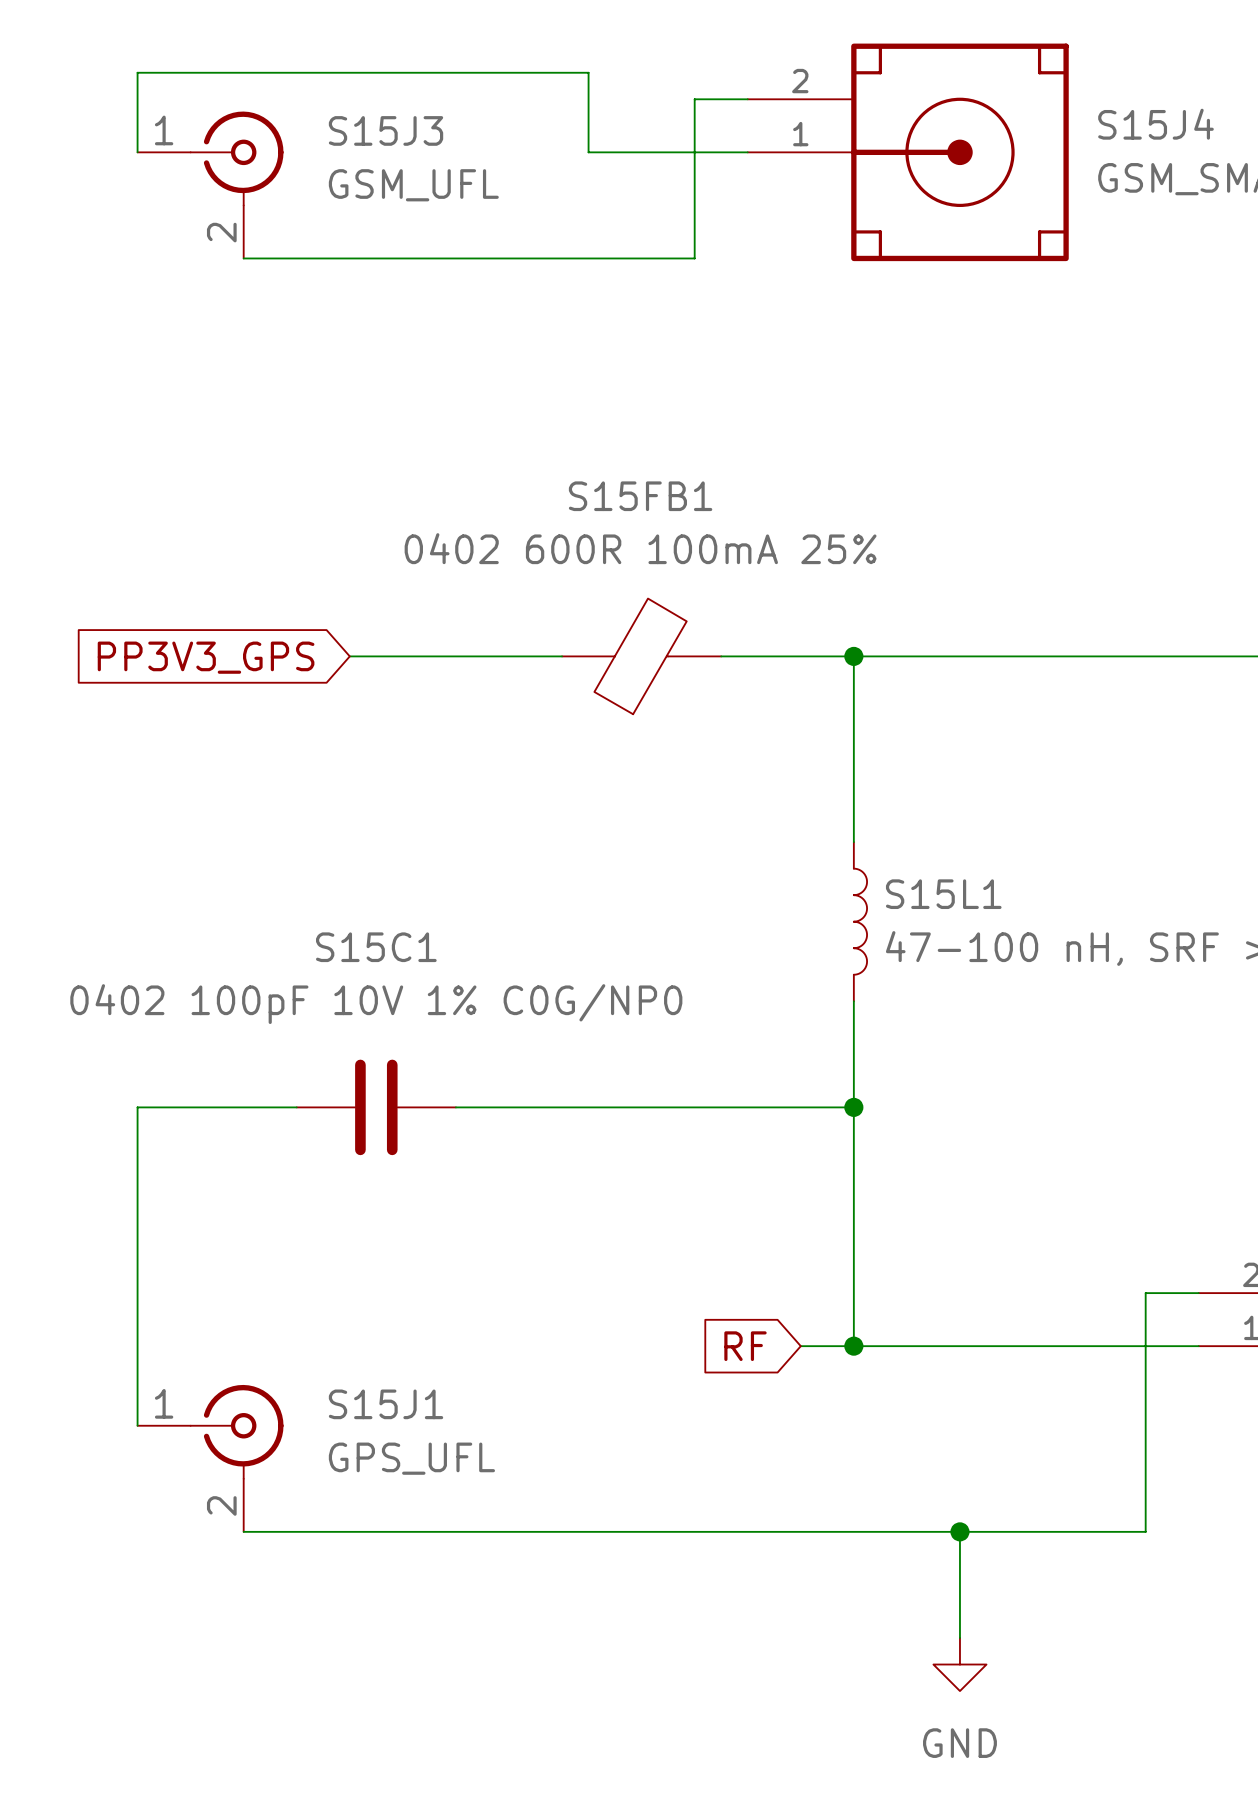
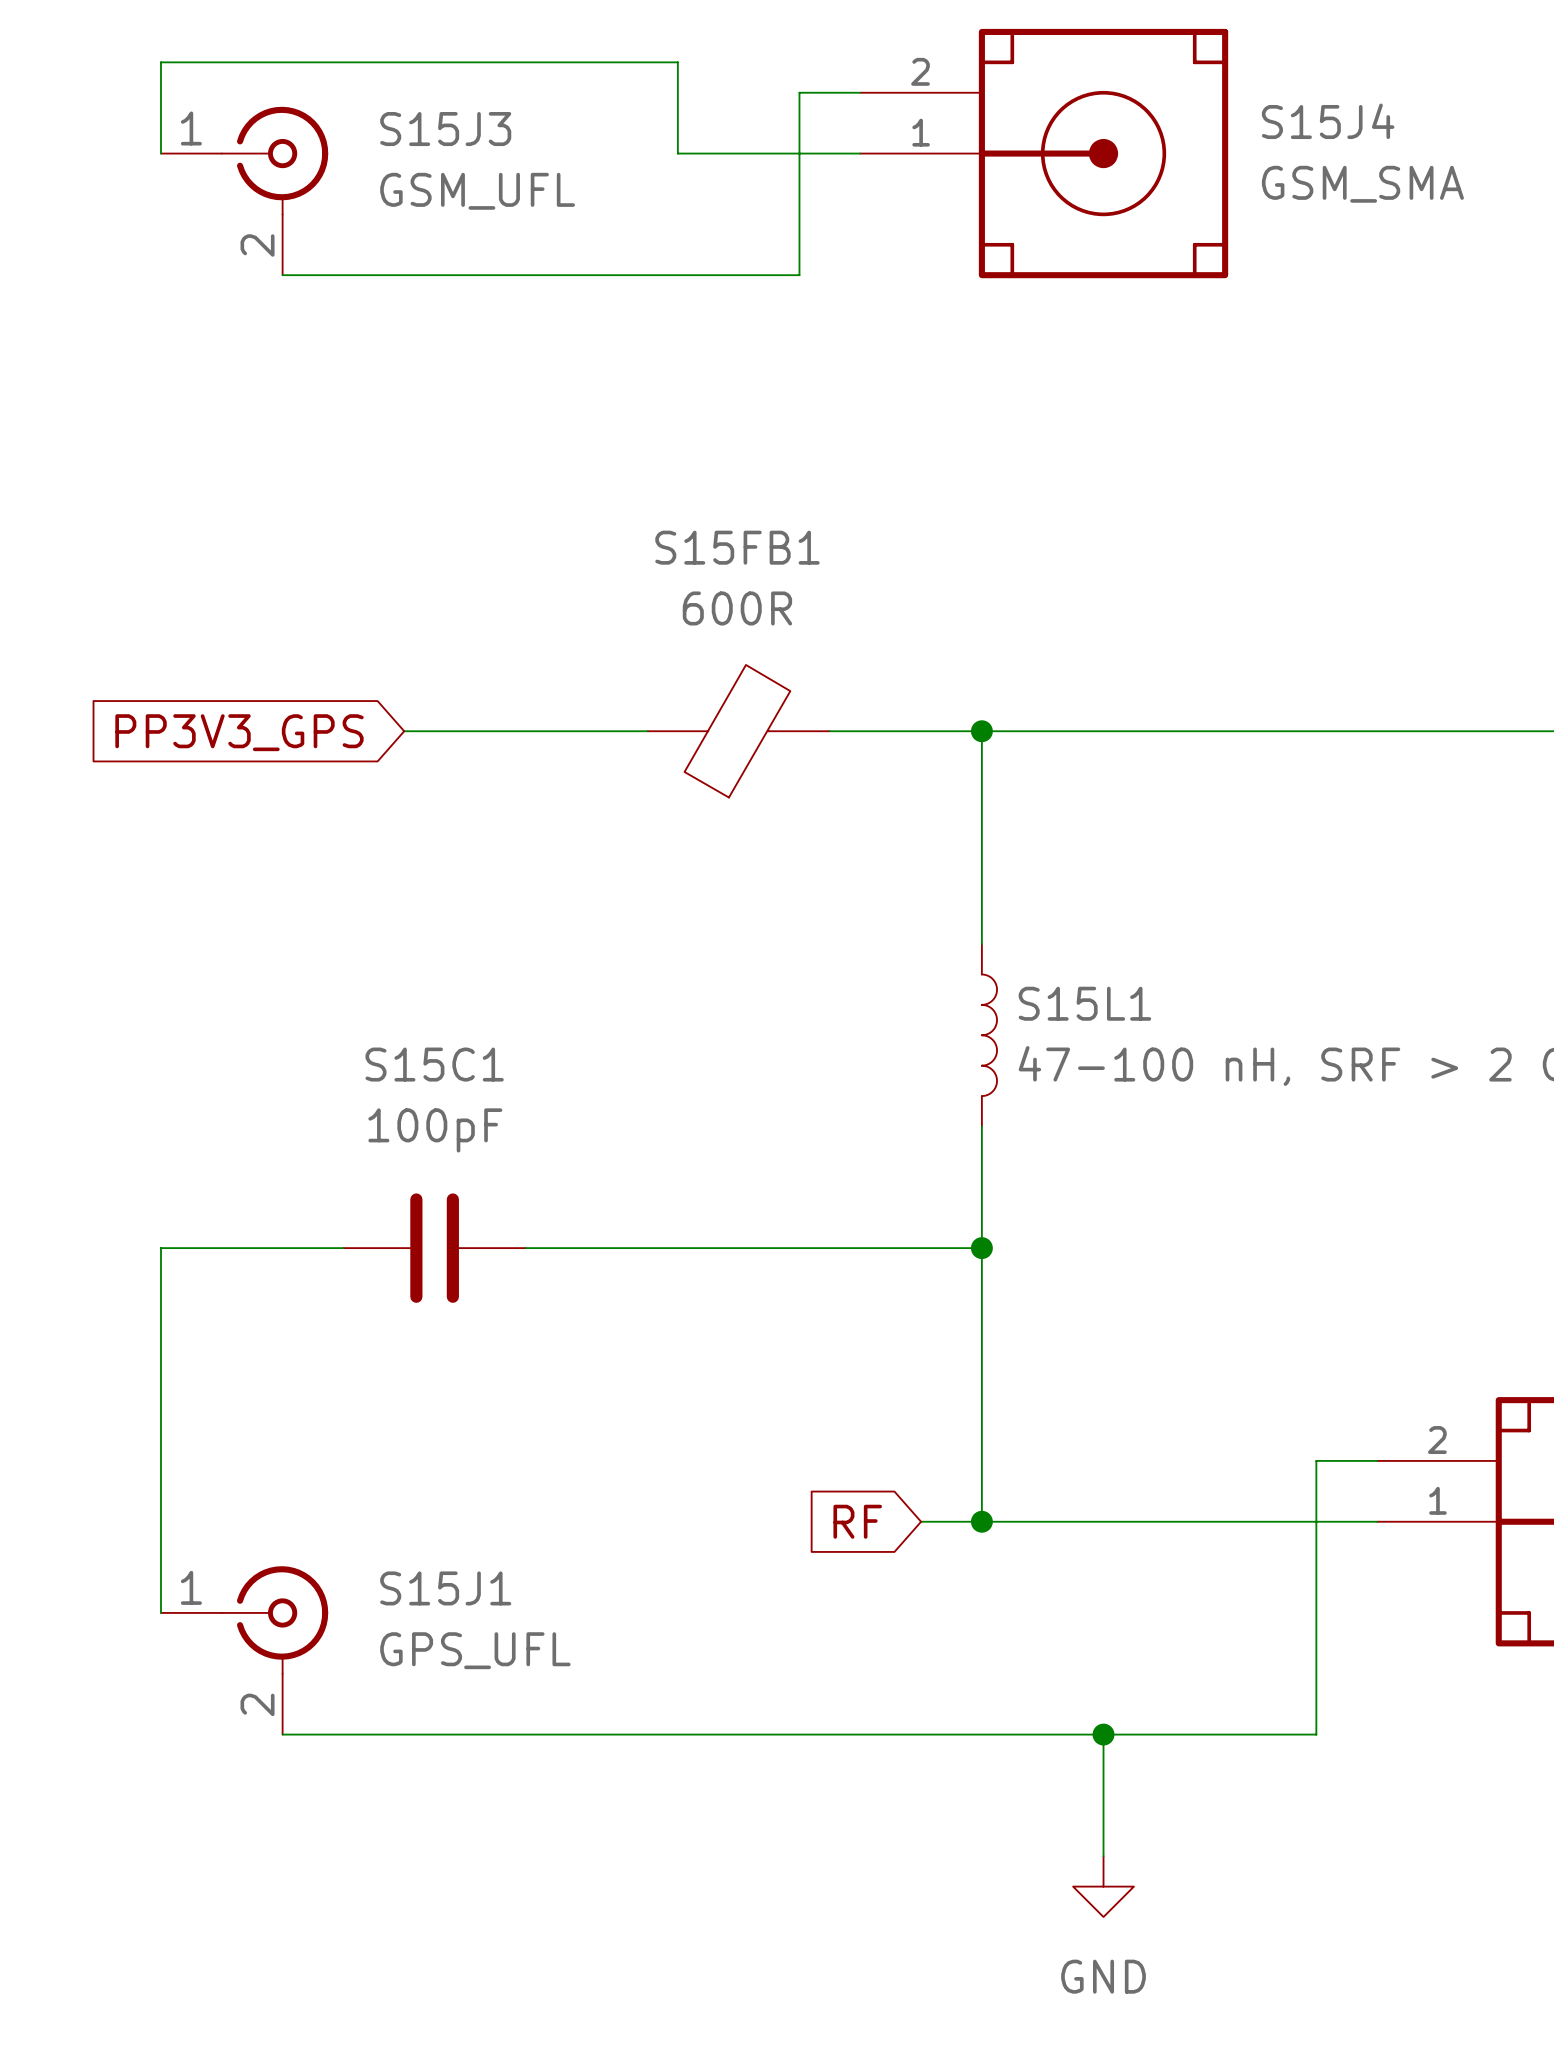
S15FB1 value: 0402 600R 100mA 25% (640, 548) -> 600R (737, 608)
S15C1 value: 0402 100pF 10V 1% C0G/NP0 (376, 1004) -> 100pF (435, 1130)

